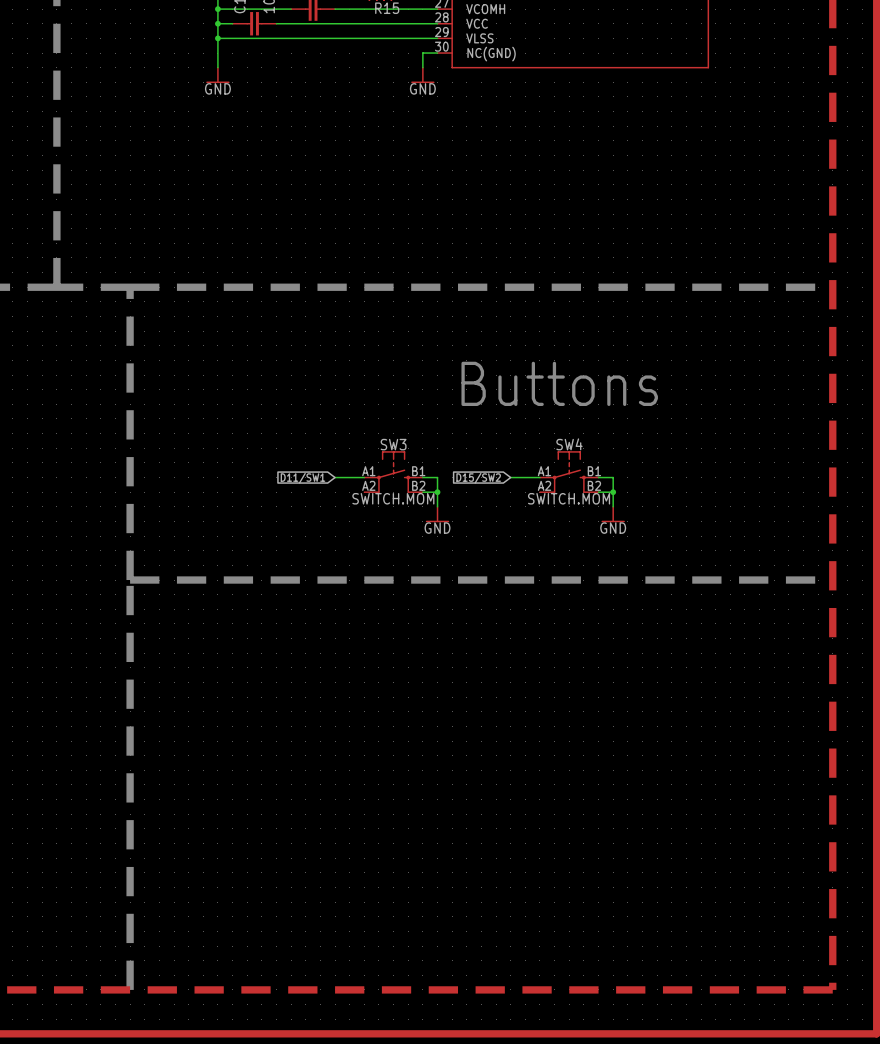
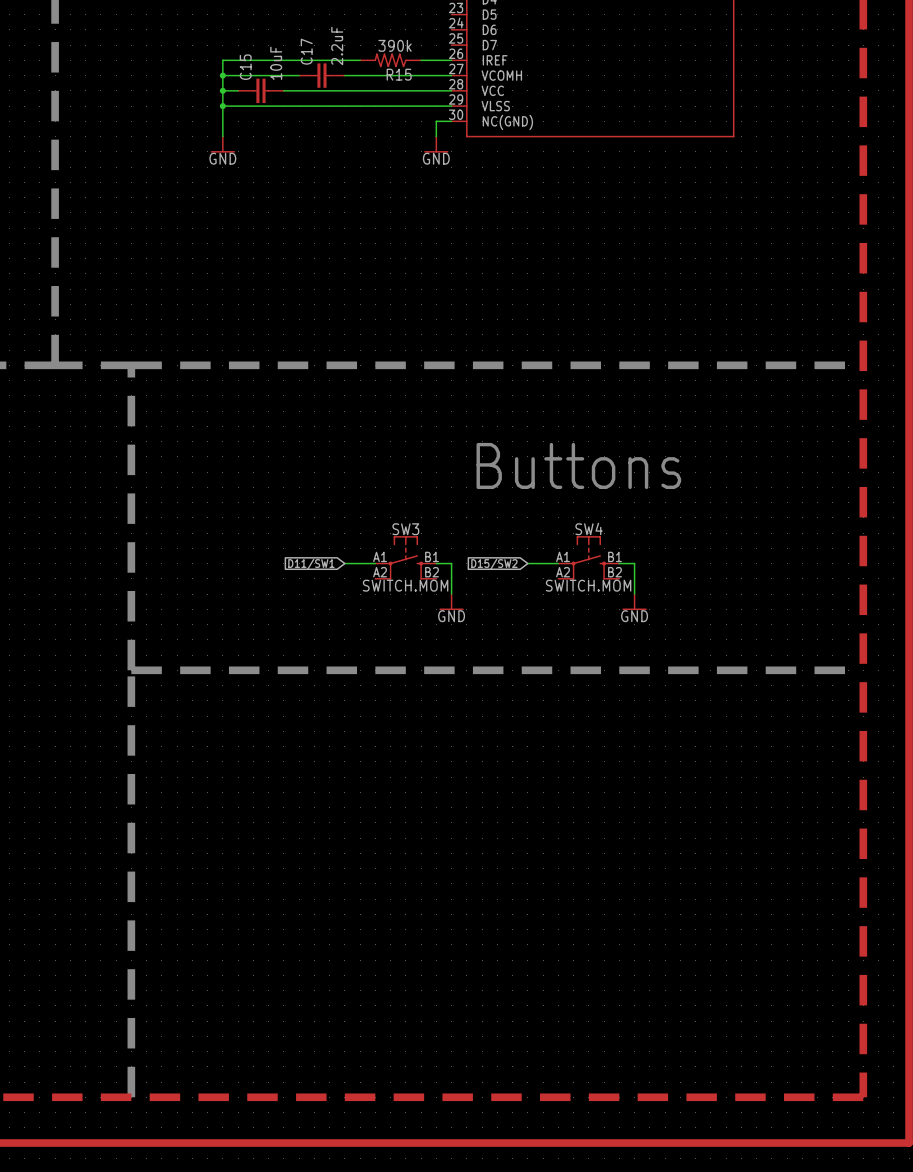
wire: (422, 492) (437, 492) -> none
junction: (437, 492) -> none
wire: (598, 492) (613, 492) -> none
junction: (613, 492) -> none

